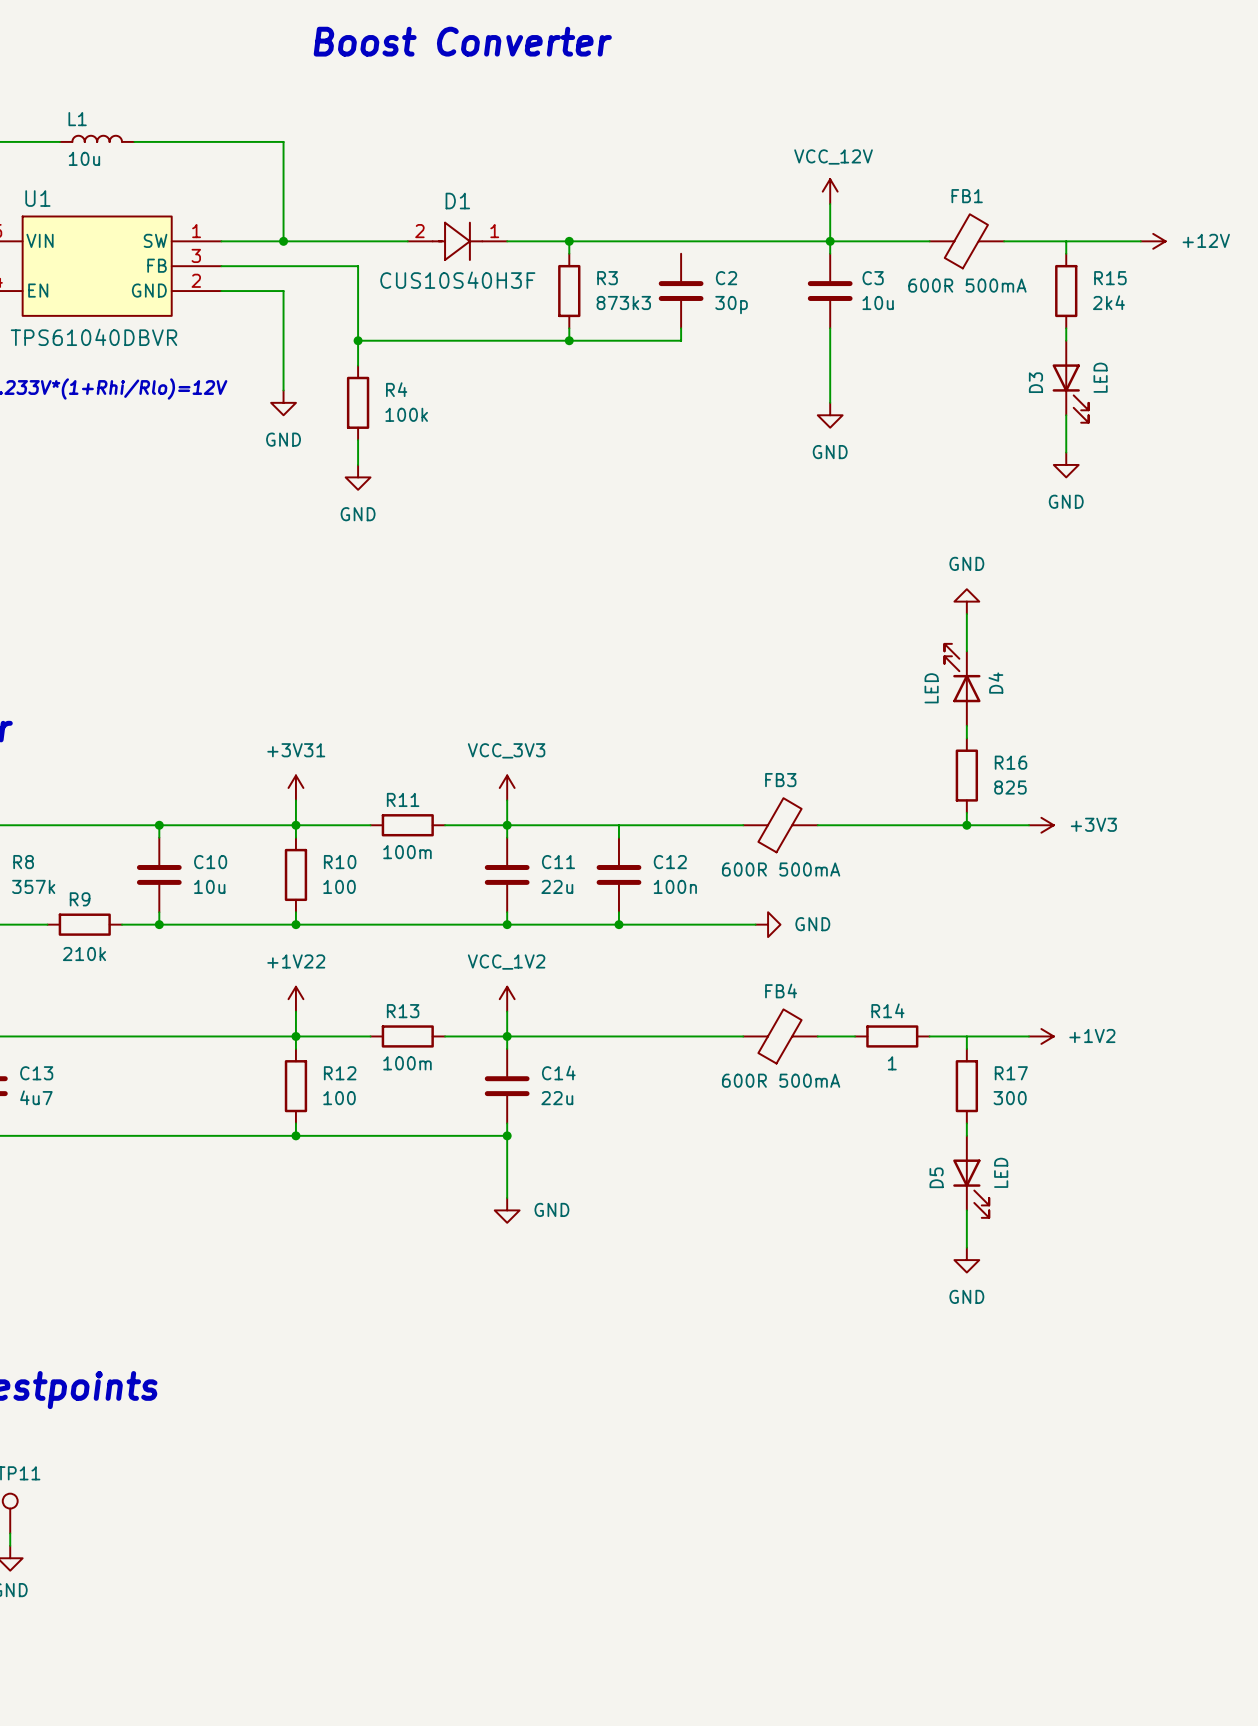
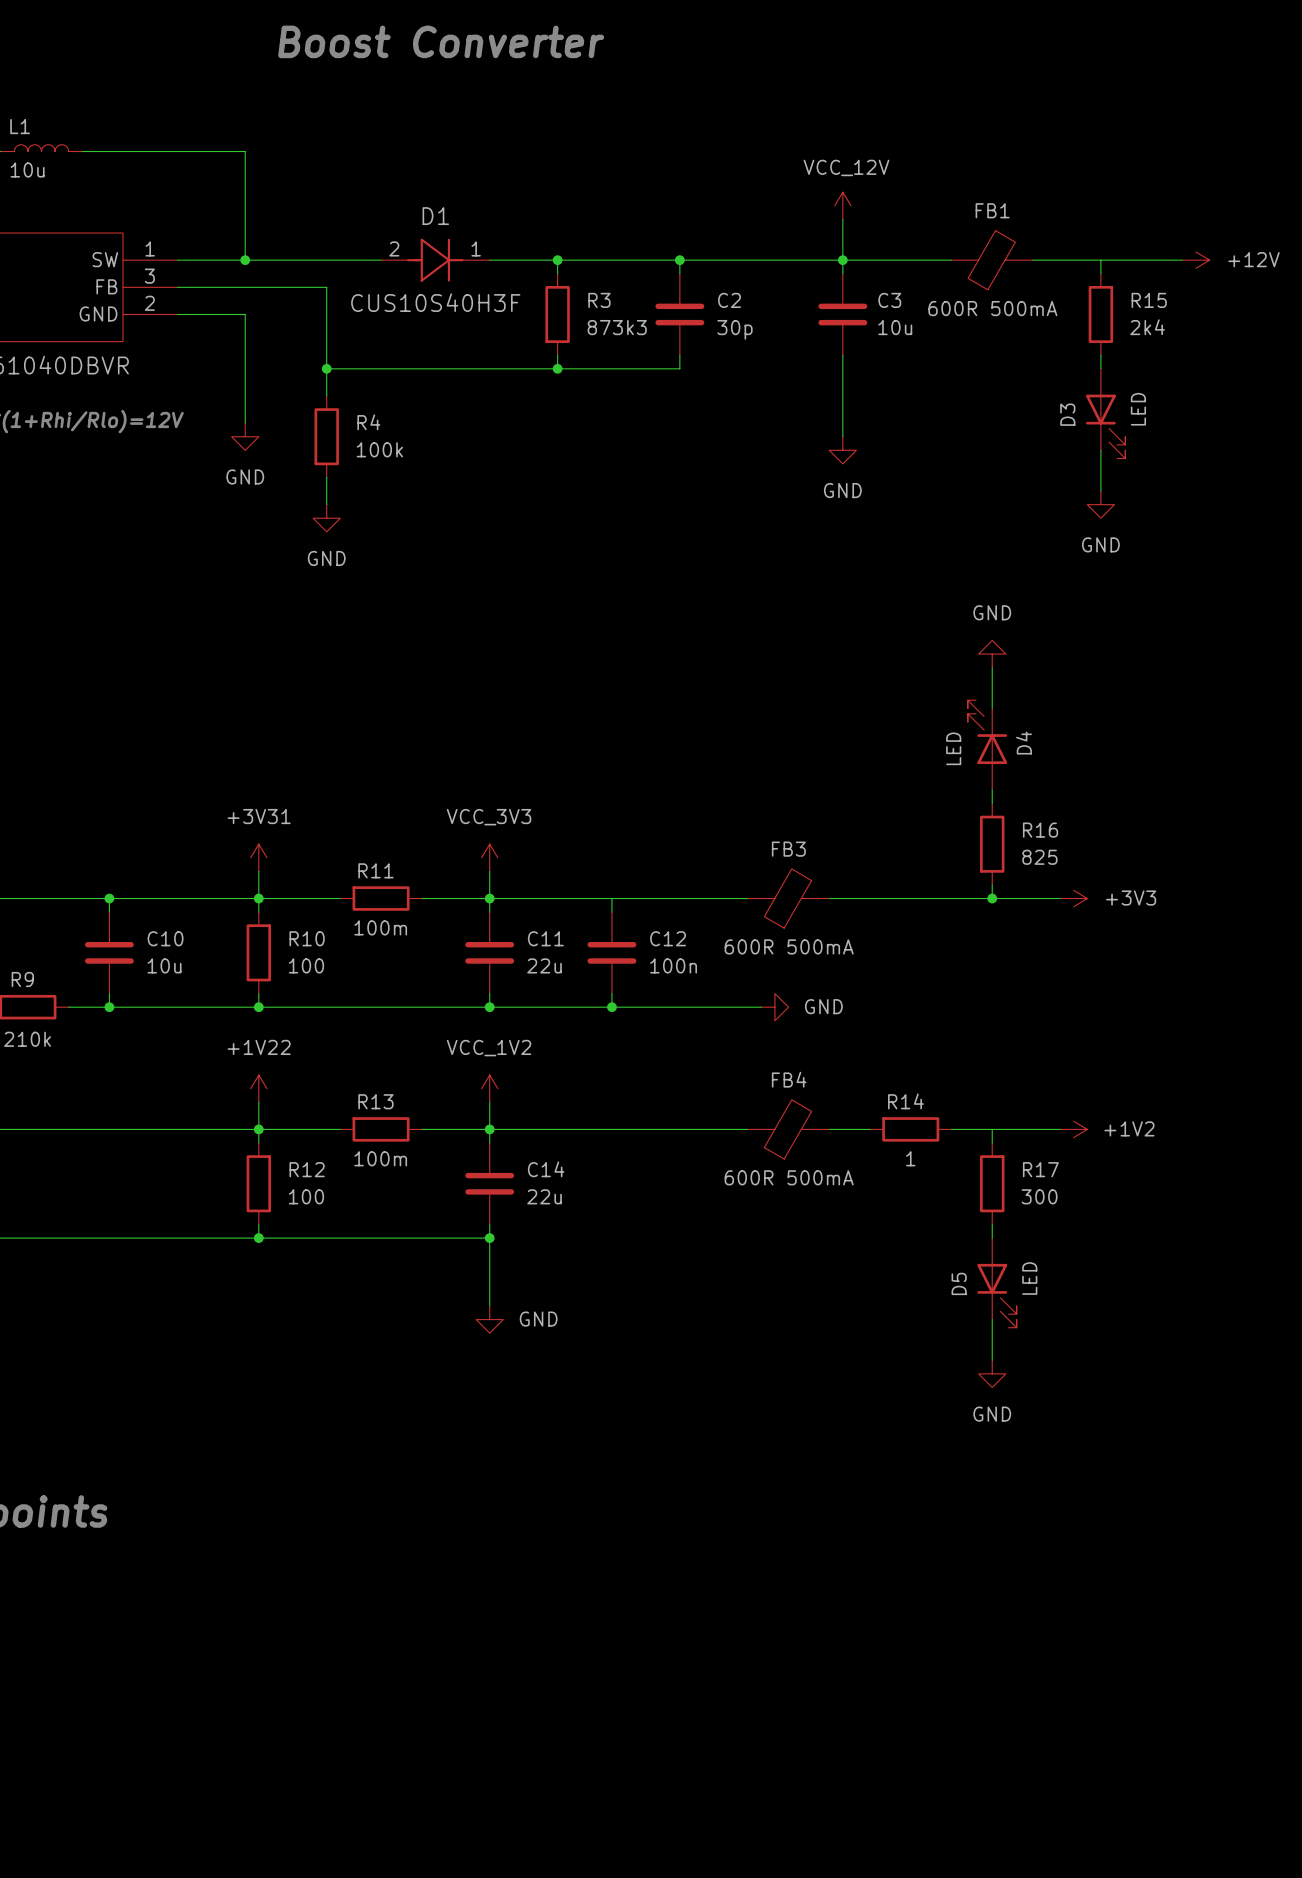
wire: none -> (679, 260) (679, 273)
junction: none -> (679, 260)

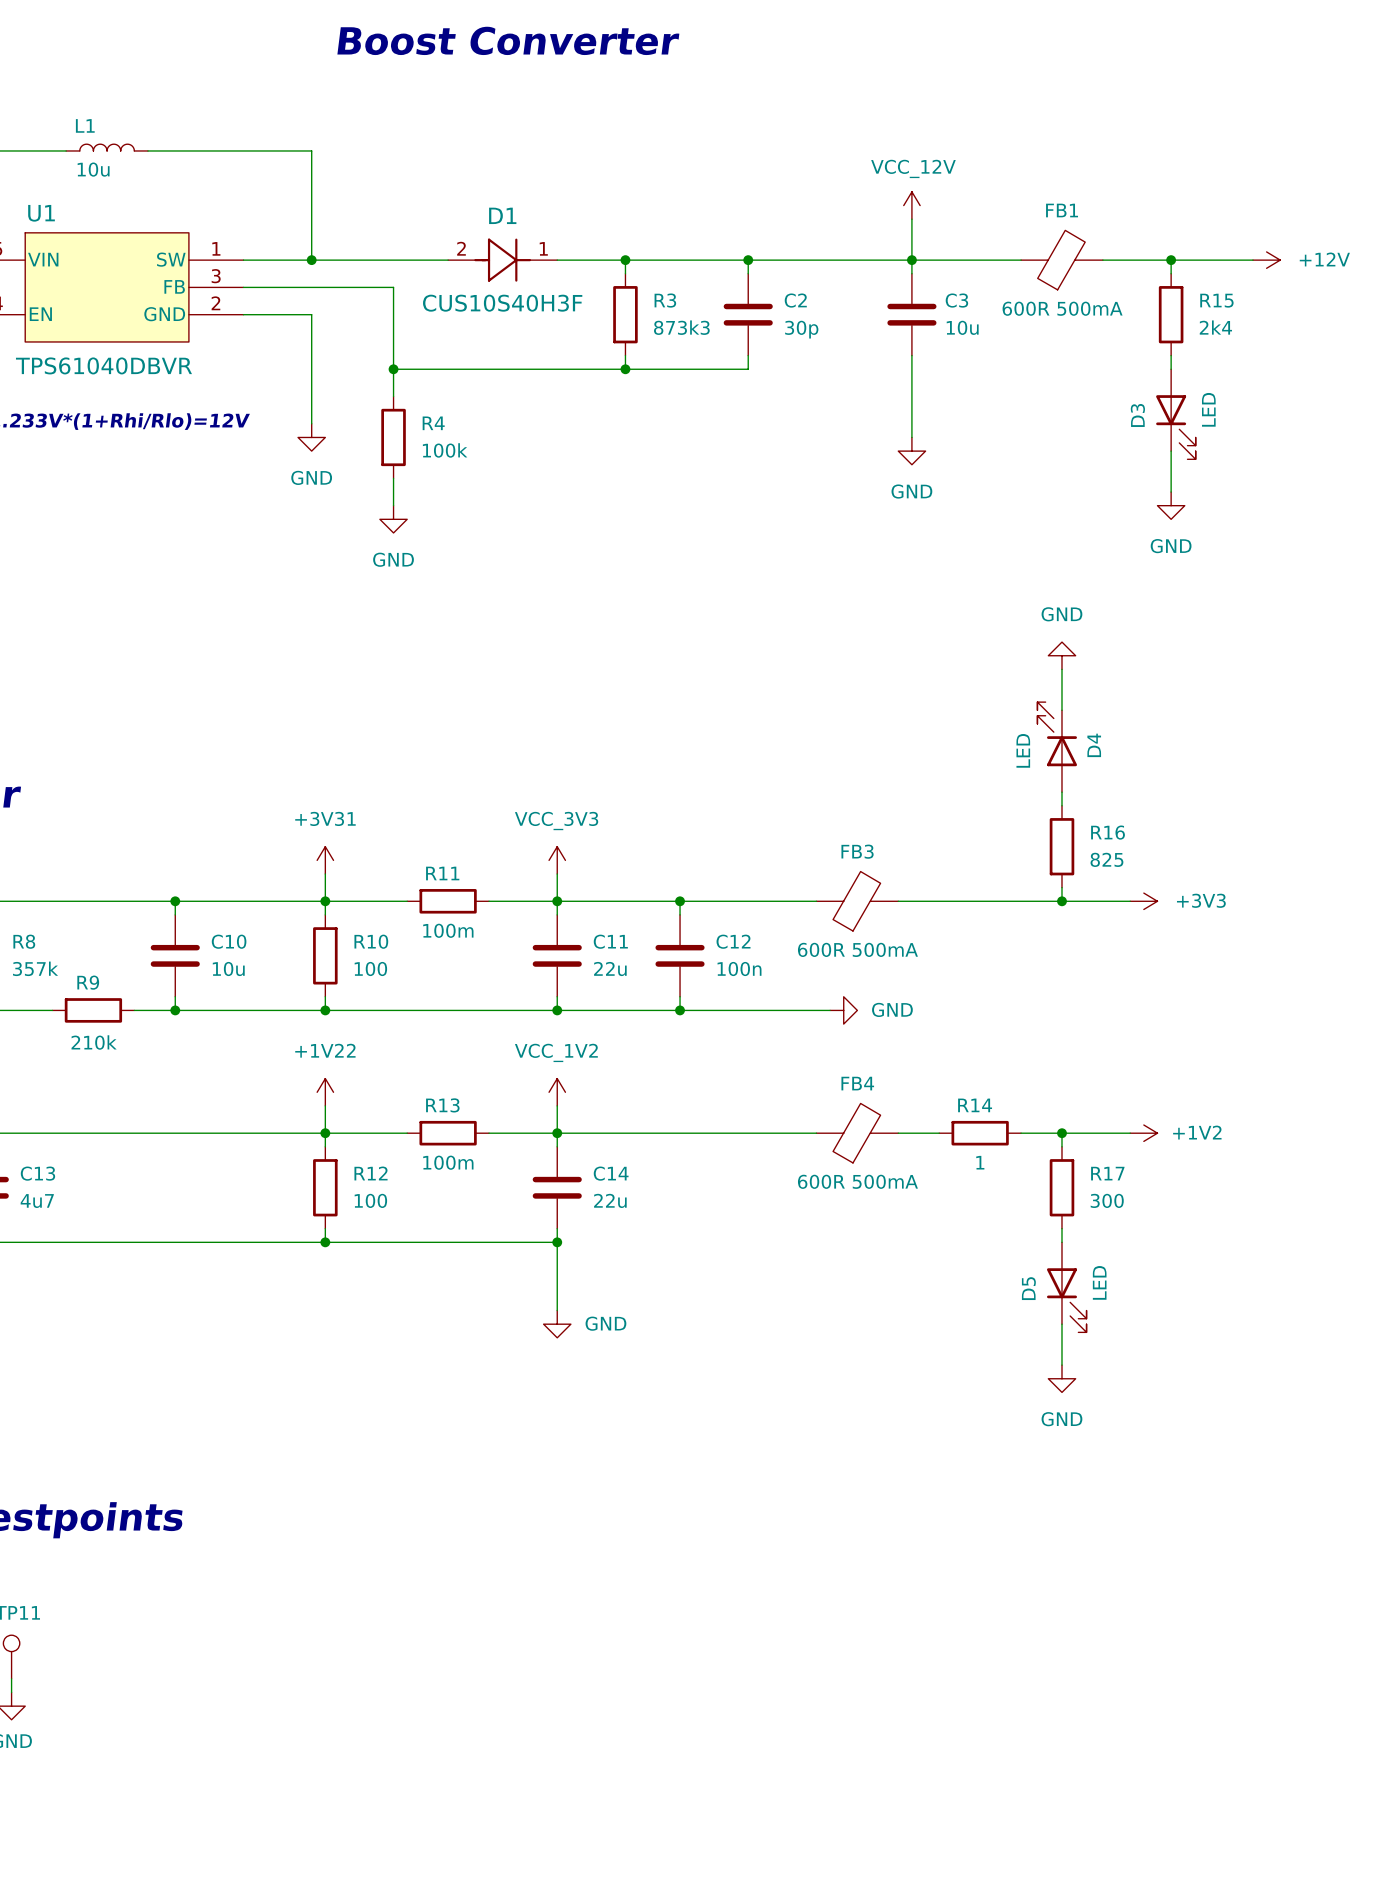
junction: none -> (1171, 260)
junction: none -> (680, 901)
junction: none -> (1061, 1133)

